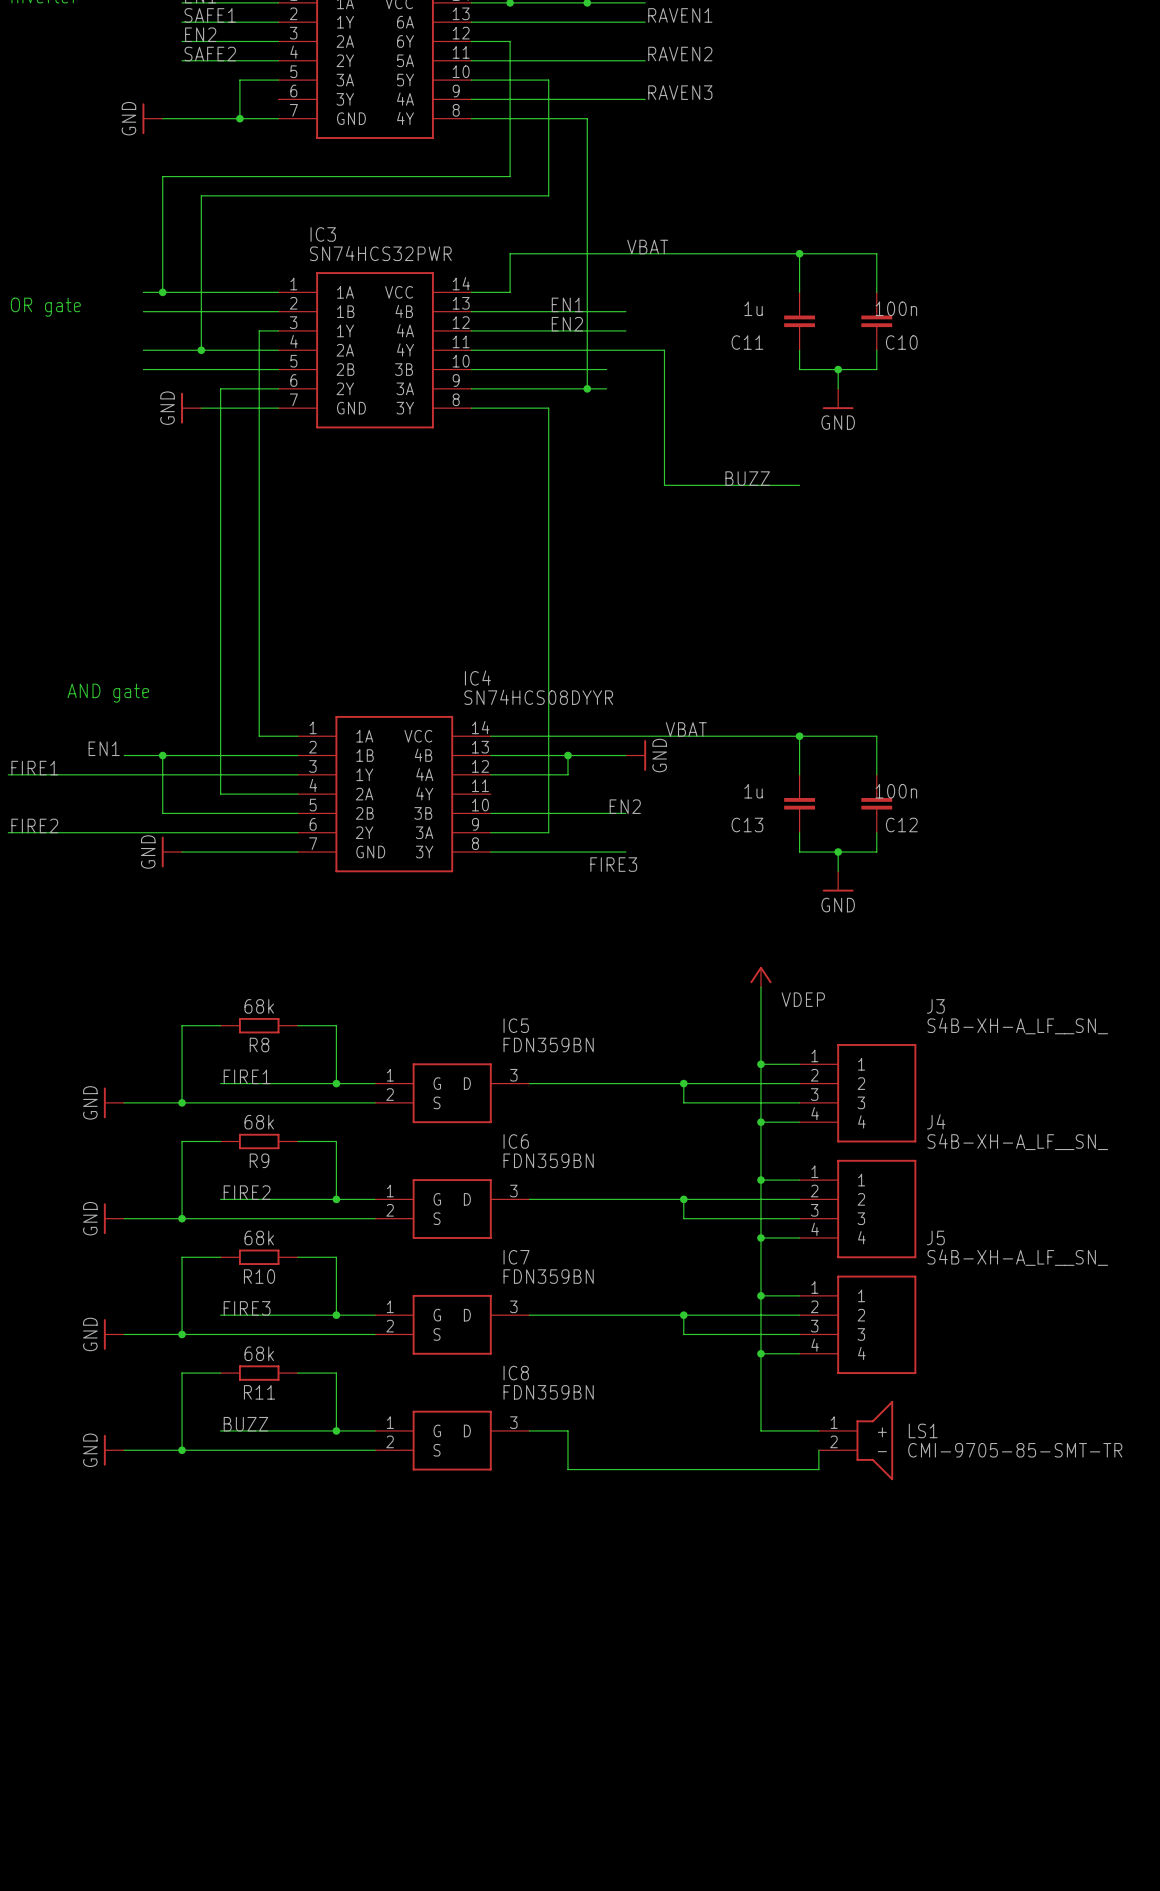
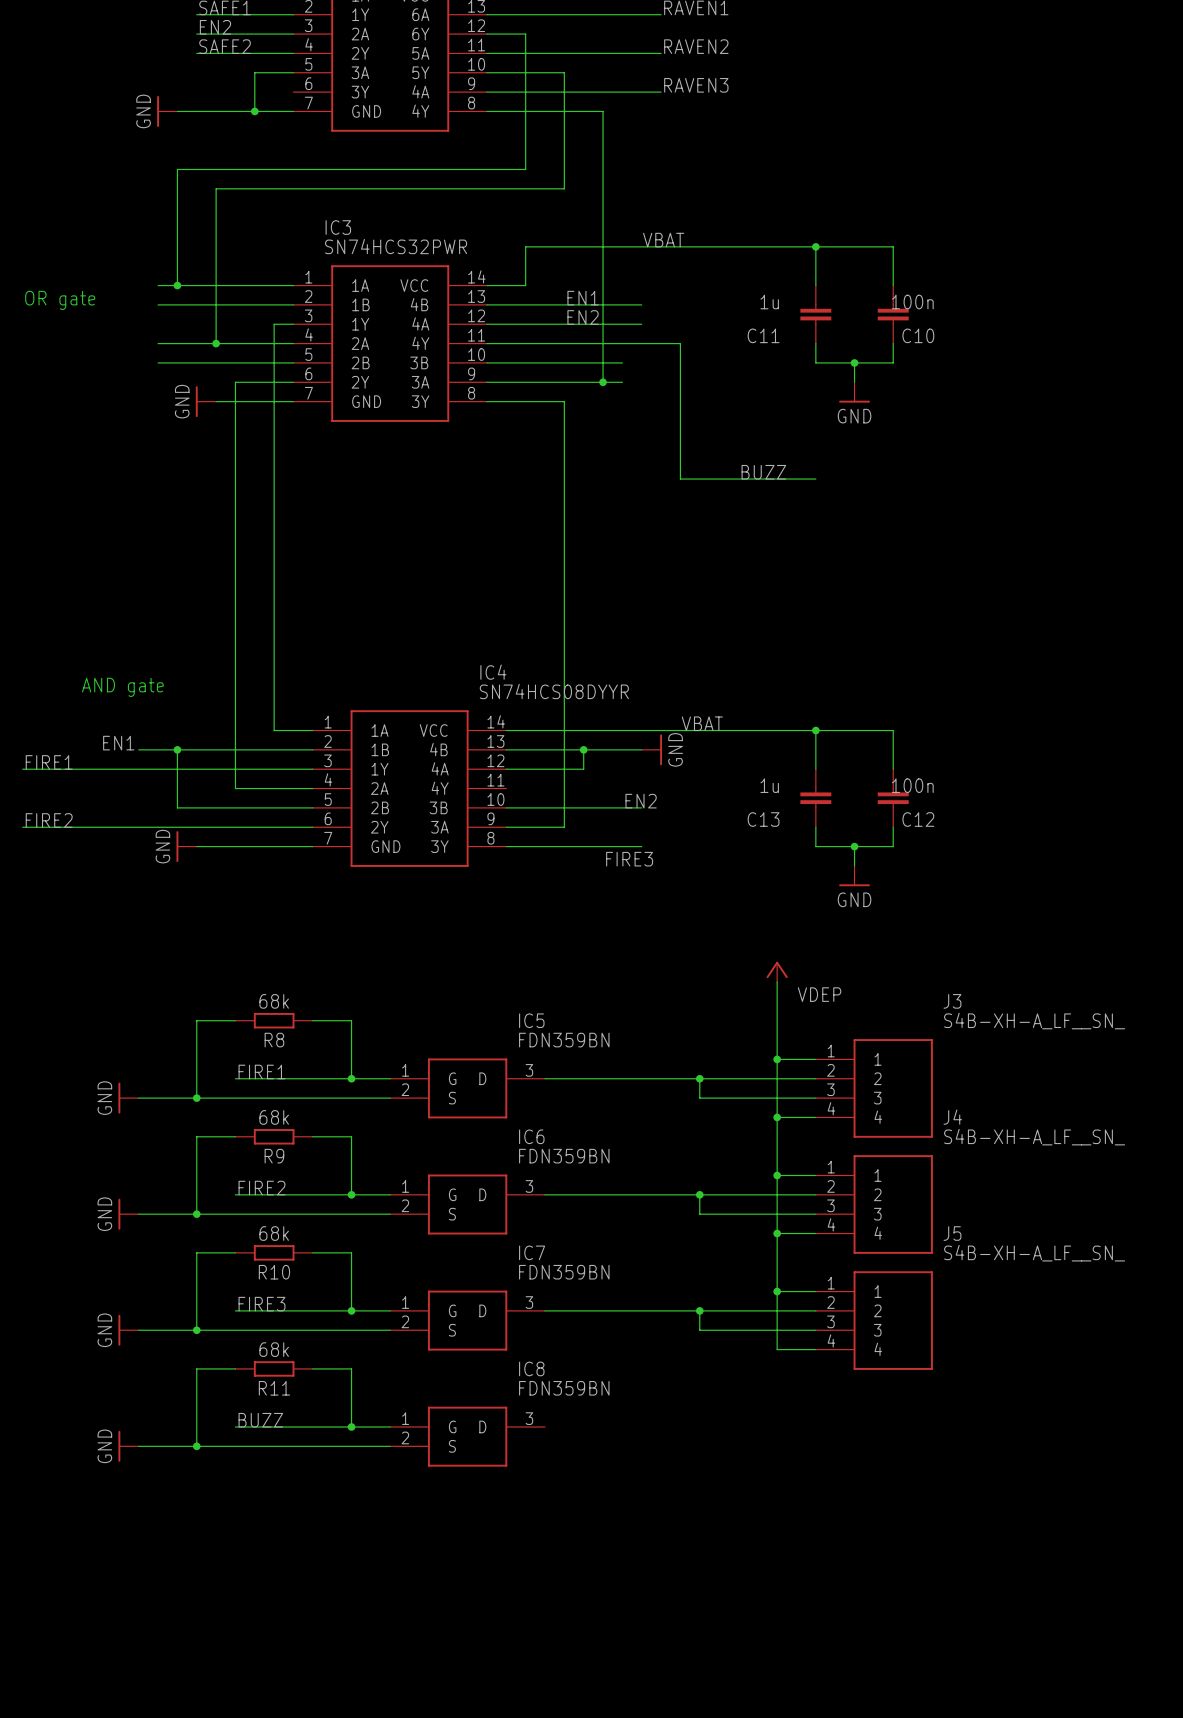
wire: (760, 1353) (760, 1430) (818, 1430) -> none
junction: (760, 1353) -> none
wire: (529, 1430) (567, 1430) (567, 1469) (818, 1469) (818, 1450) -> none
LS1: CMI-9705-85-SMT-TR (856, 1440) -> none

